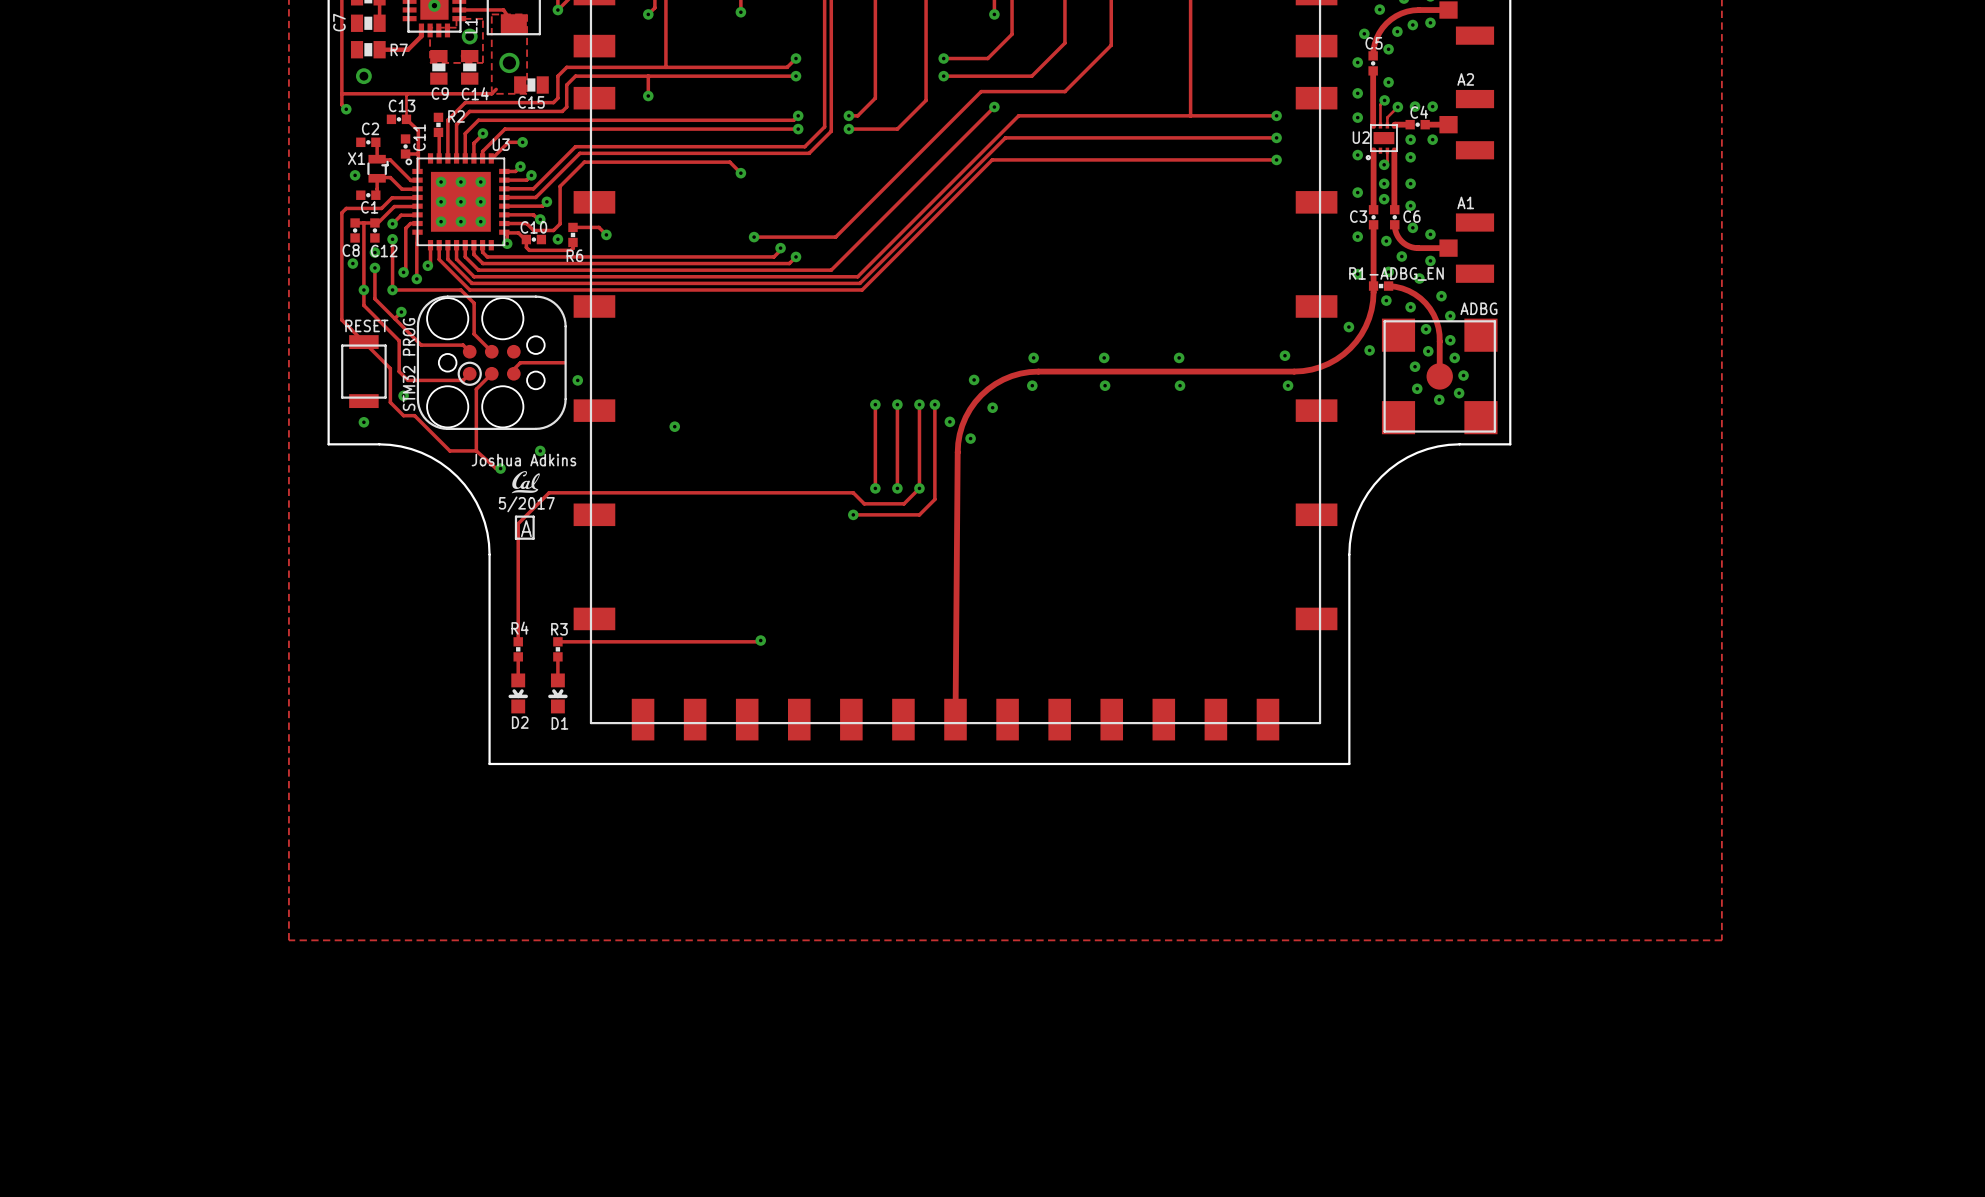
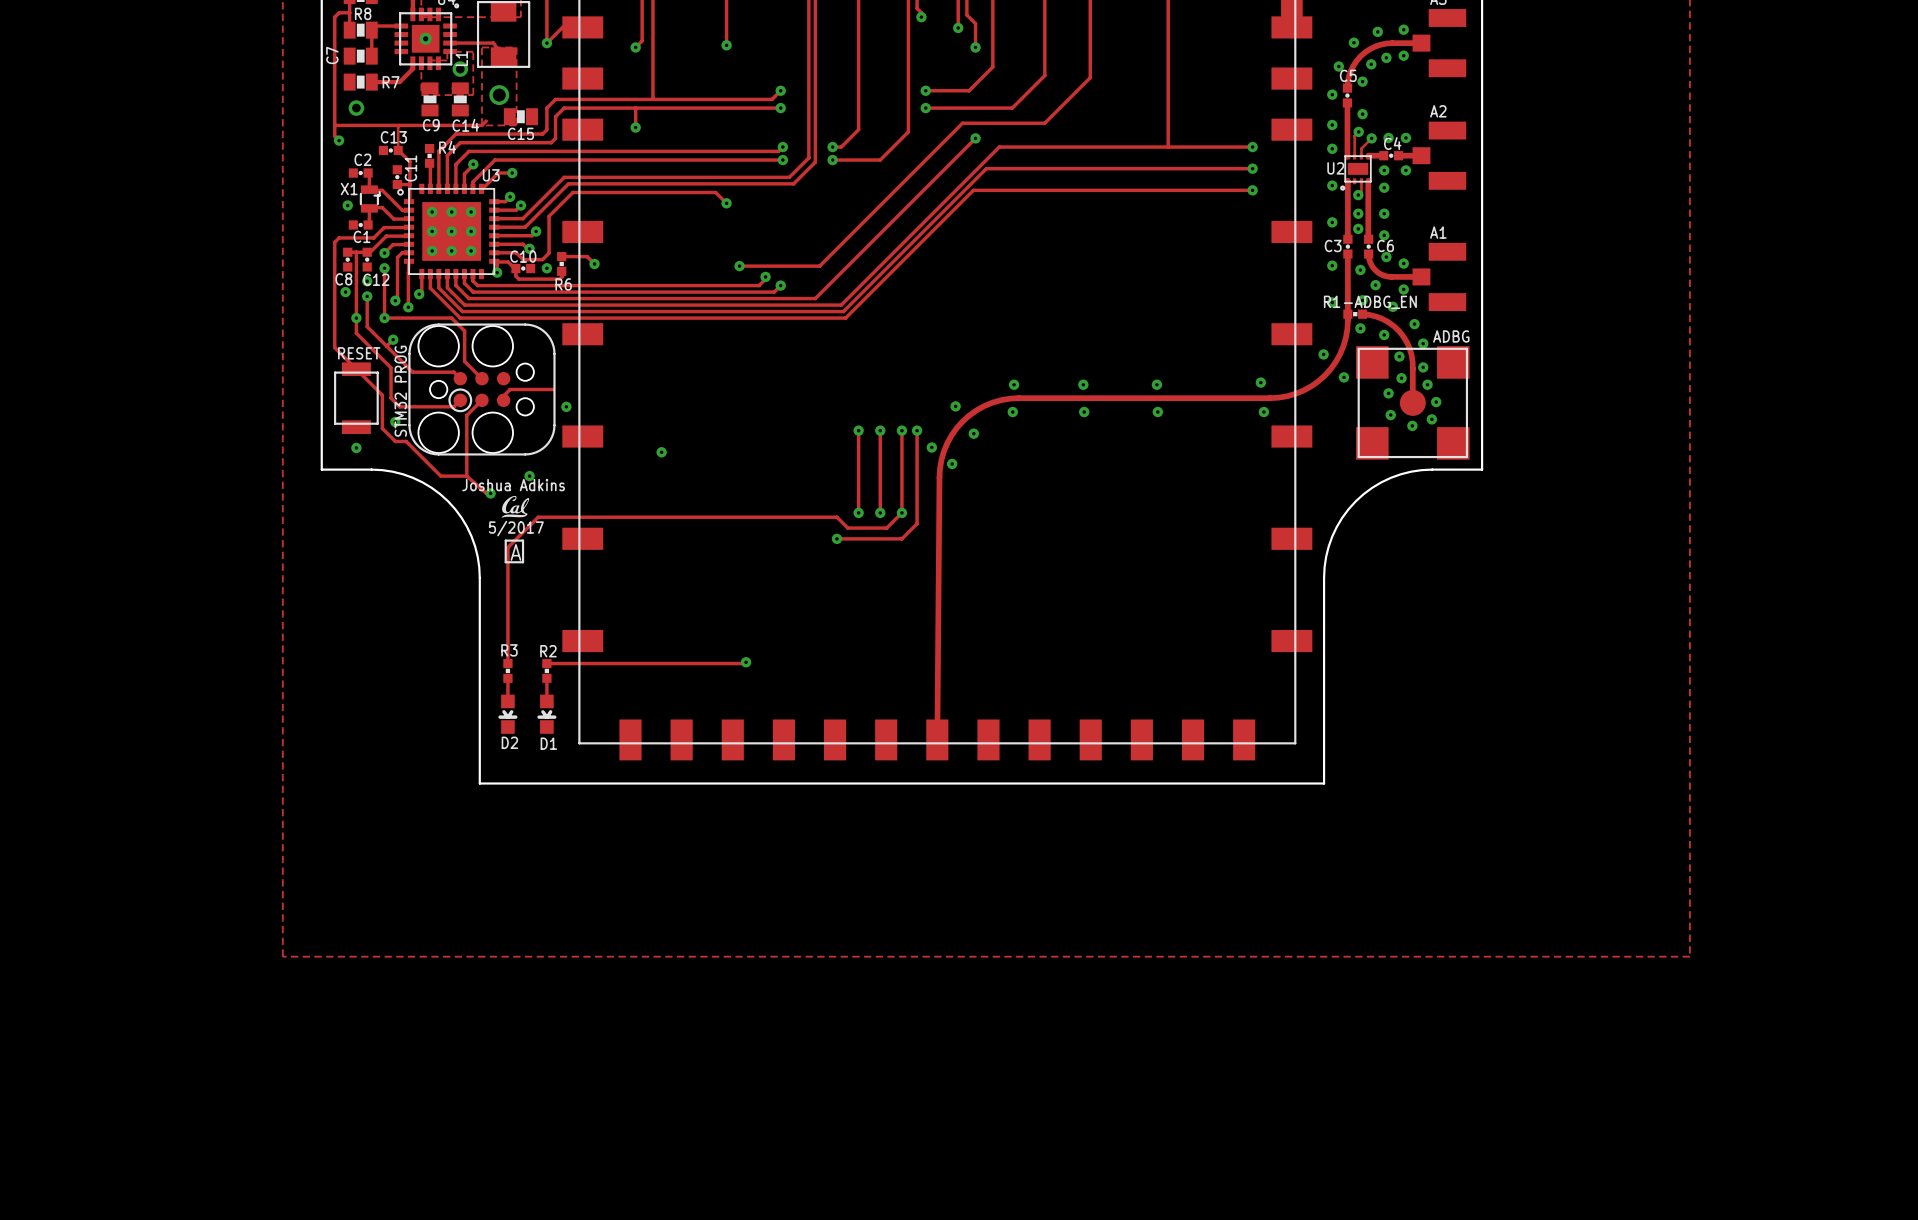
R2 name: R2 (456, 116) -> R4 (447, 147)
R4 name: R4 (520, 628) -> R3 (509, 650)
R3 name: R3 (559, 629) -> R2 (548, 651)

